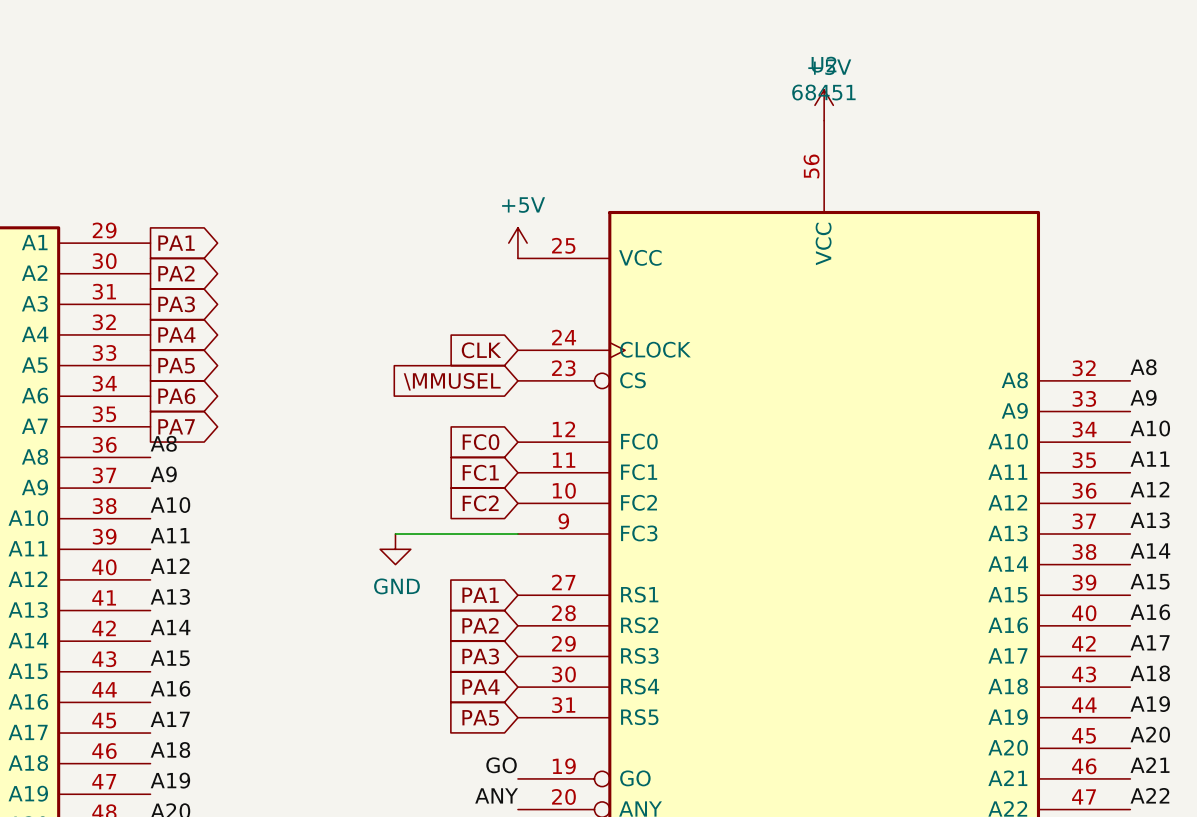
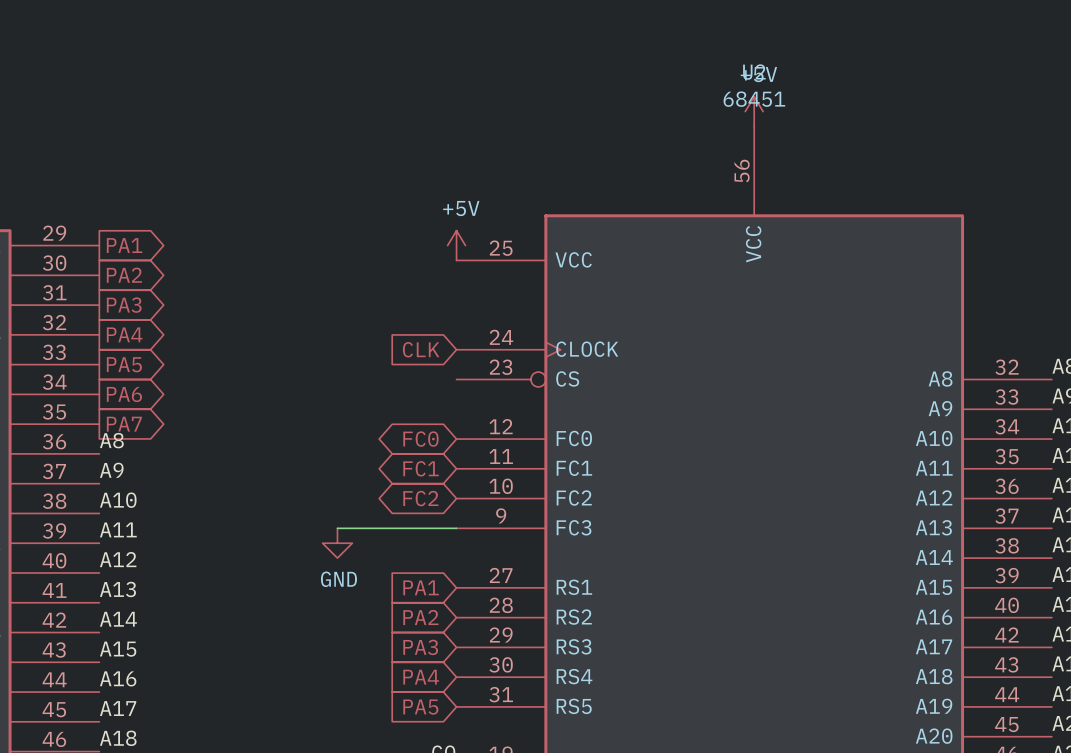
global label: \MMUSEL (452, 381) -> none
global label shape: input (481, 442) -> bidirectional (420, 439)
global label shape: input (480, 472) -> bidirectional (421, 468)
global label shape: input (480, 503) -> bidirectional (420, 498)

